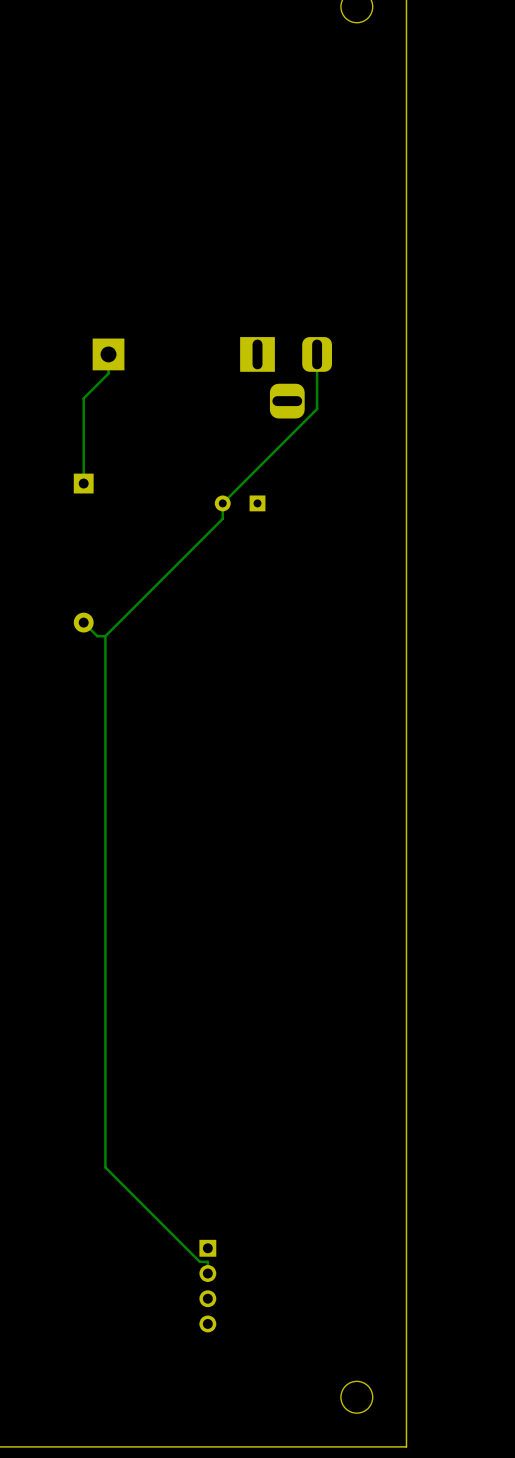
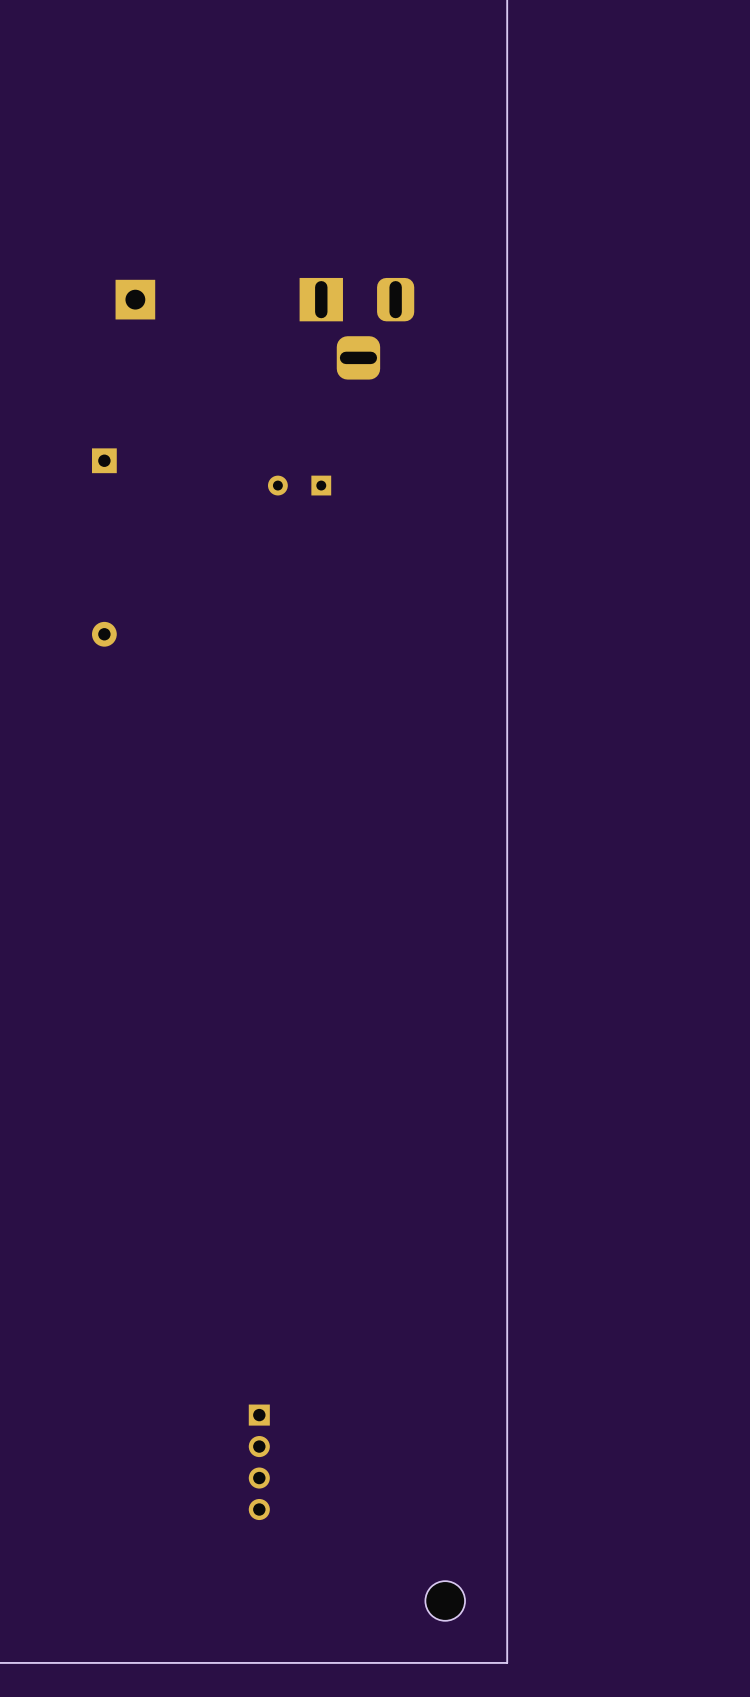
track: (108, 354) (108, 373) (83, 398) (83, 483) -> none
track: (317, 354) (317, 409) (222, 503) (222, 518) (105, 636) -> none
track: (83, 622) (97, 636) (105, 636) -> none
track: (105, 636) (105, 1167) (199, 1261) (207, 1261) (207, 1273) -> none

